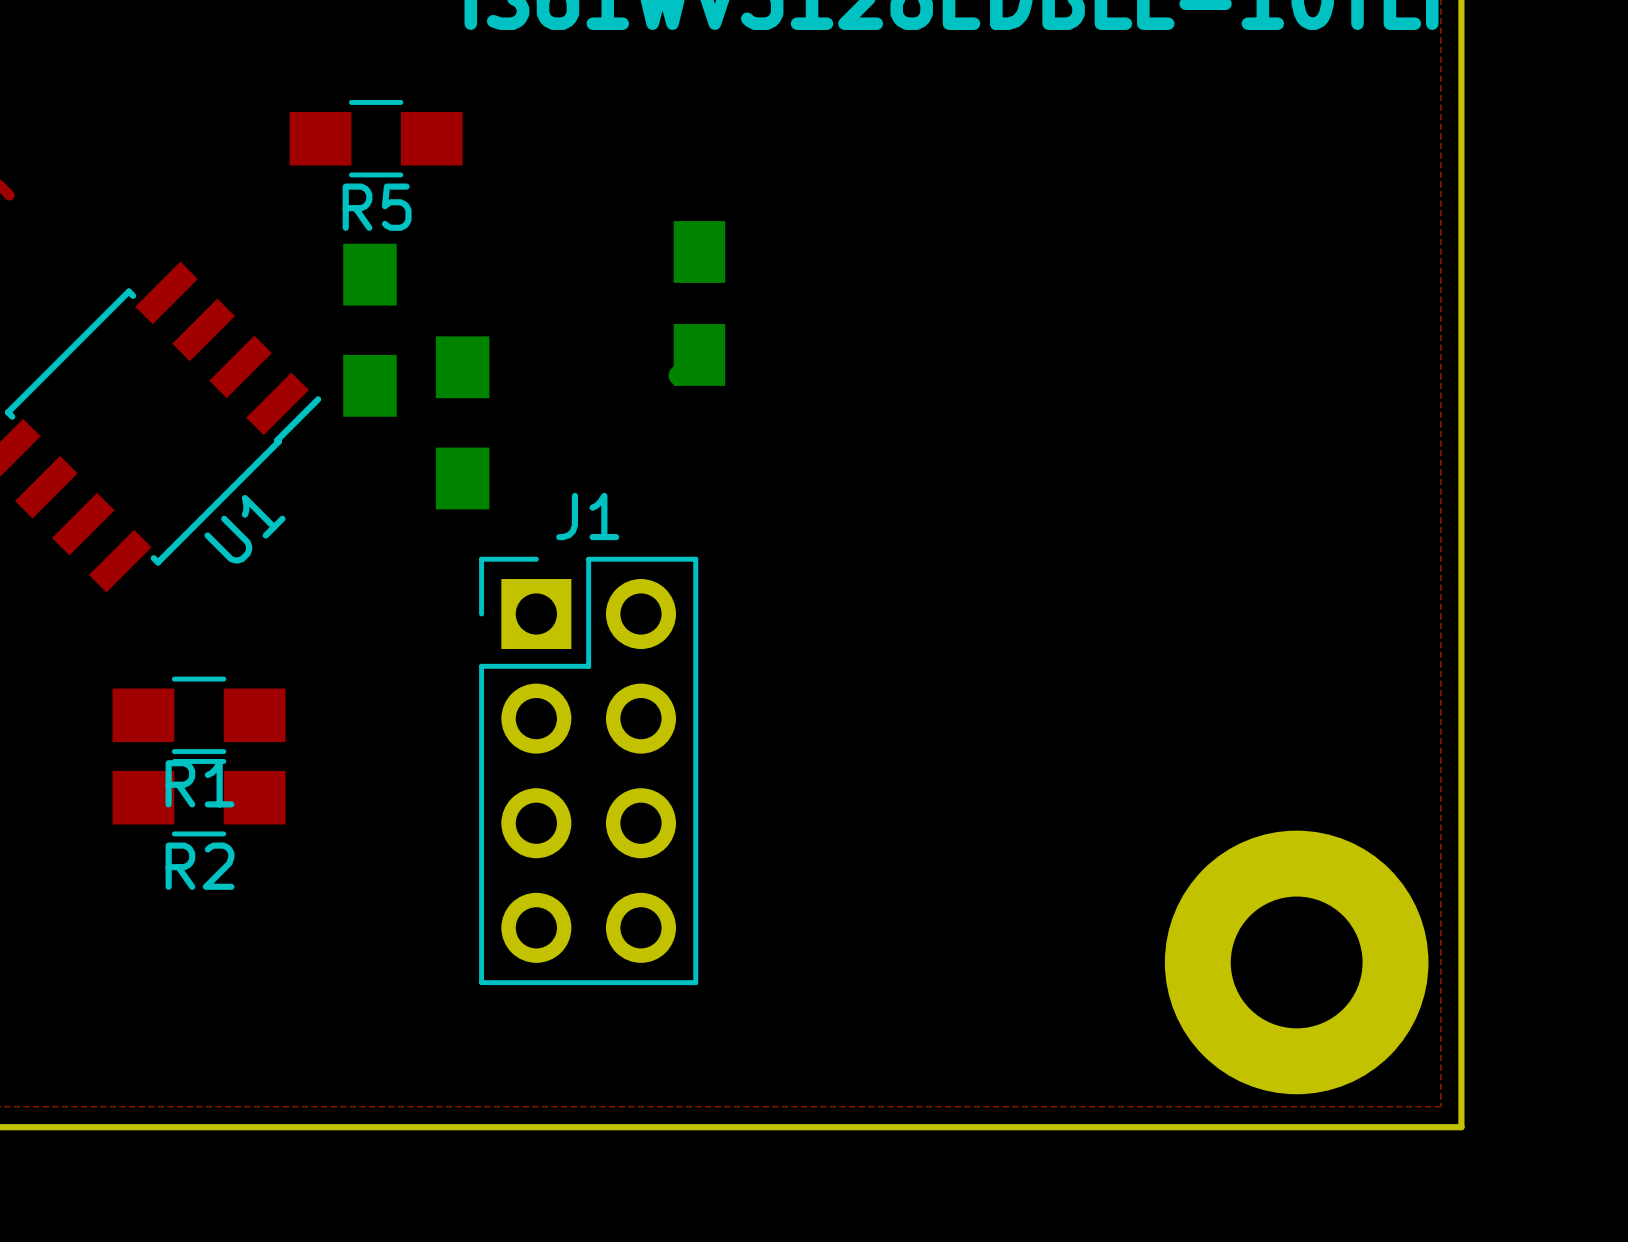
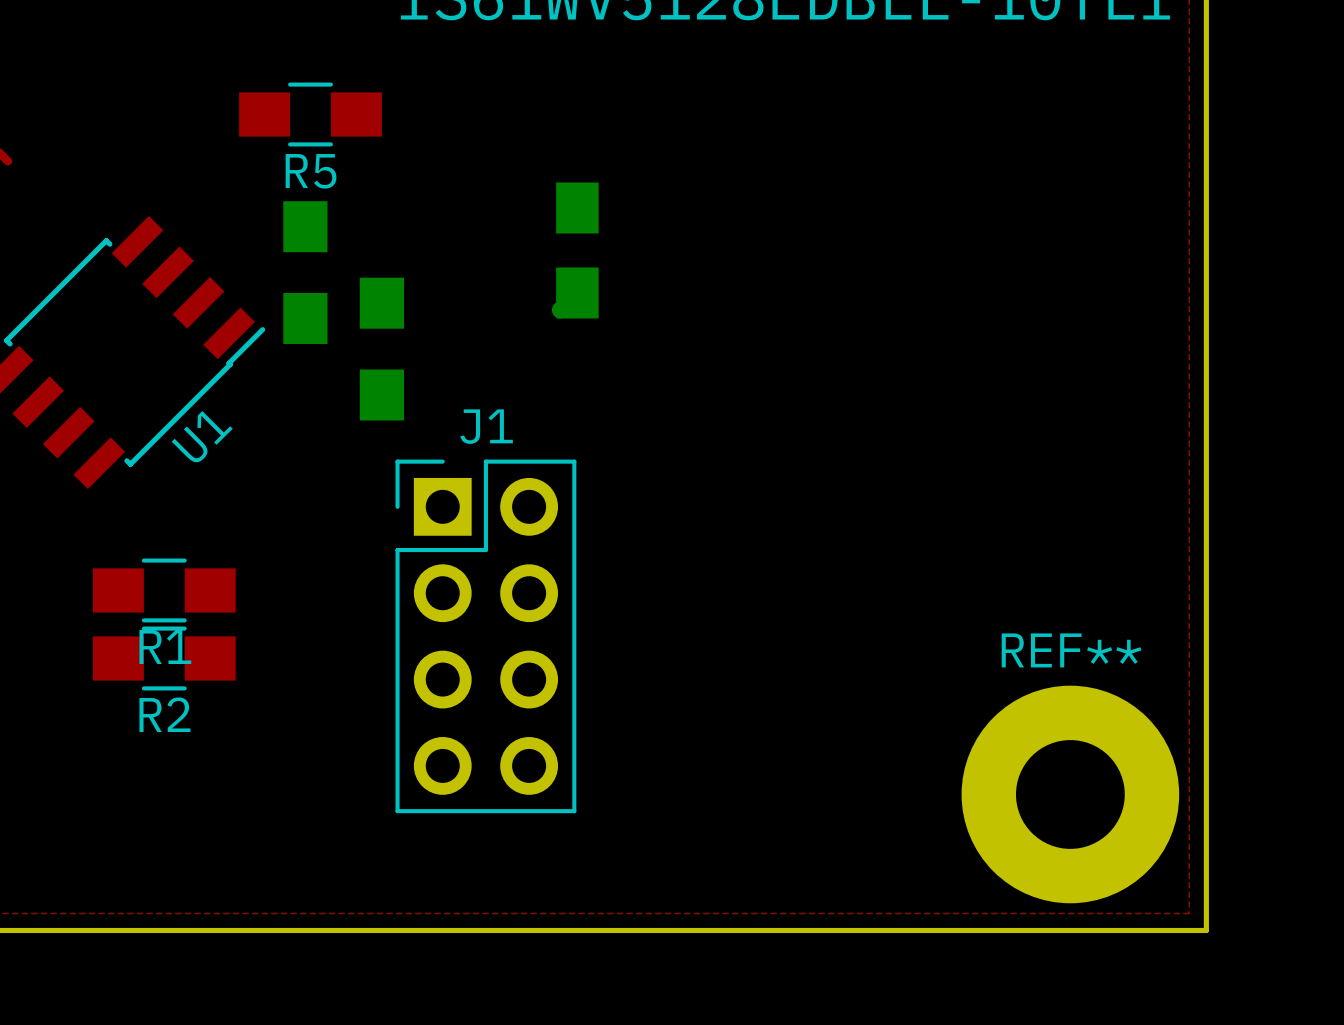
REF** name: none -> REF** (1071, 650)

